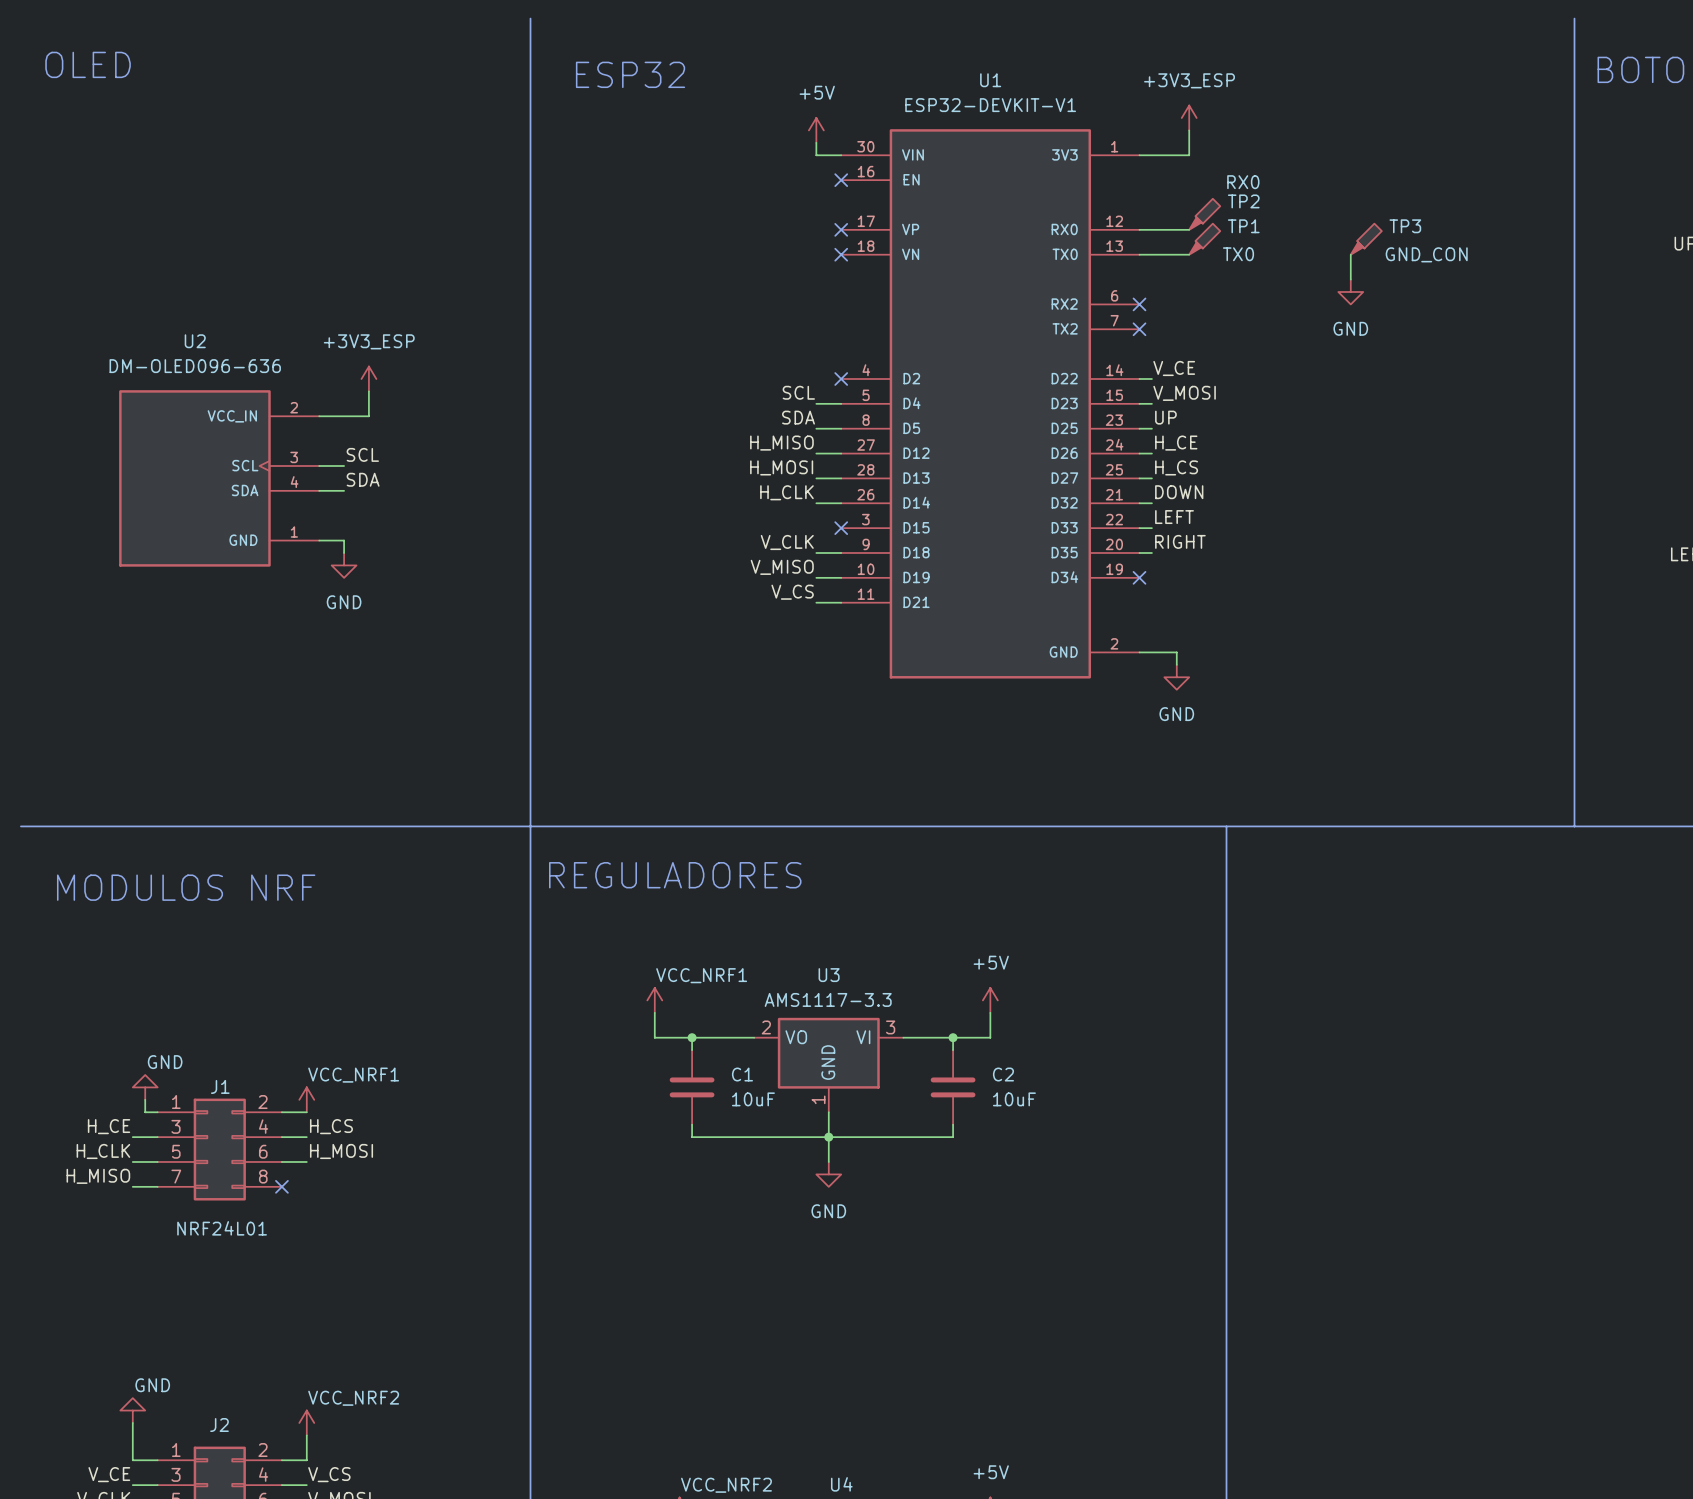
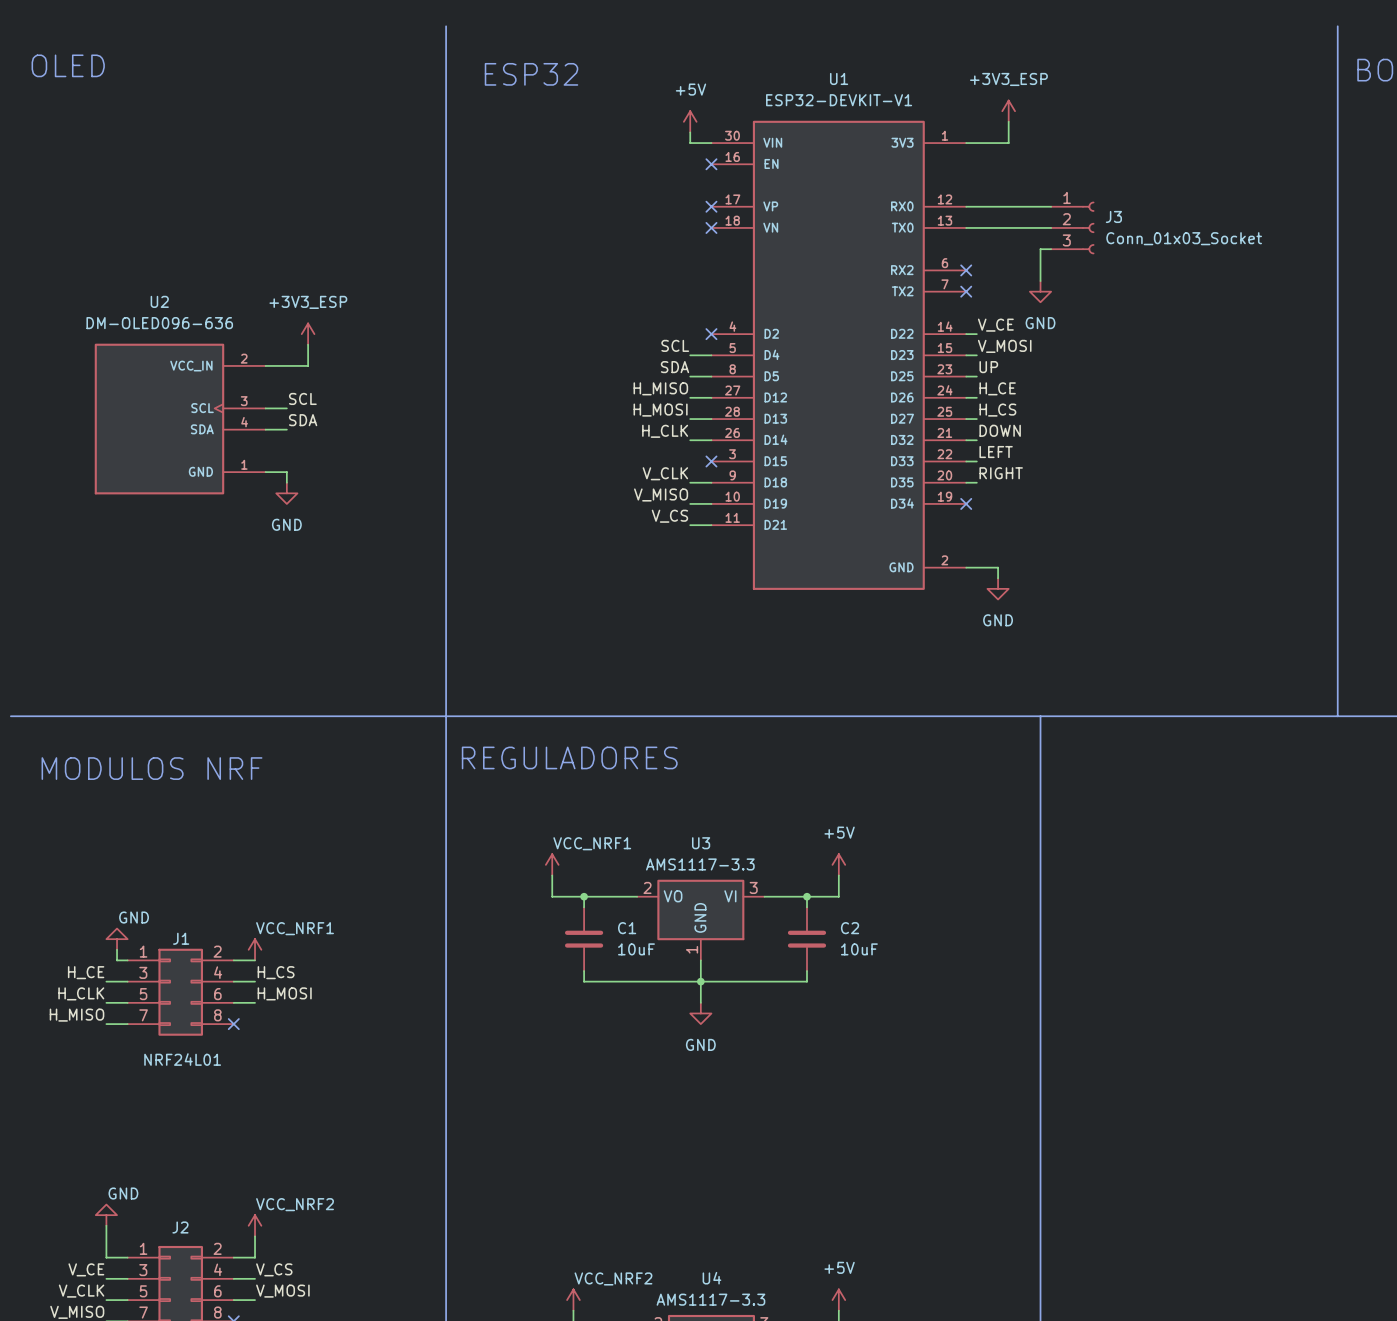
TP2: RX0 (1204, 214) -> none
wire: none -> (1008, 206) (1051, 206)
TP1: TX0 (1204, 239) -> none
TP3: GND_CON (1366, 239) -> none
wire: none -> (1008, 227) (1051, 227)
J3: none -> Conn_01x03_Socket (1072, 227)
wire: (1350, 254) (1350, 279) -> none
wire: none -> (1051, 249) (1040, 249) (1040, 281)
power symbol position: GND (1350, 291) -> GND (1040, 291)

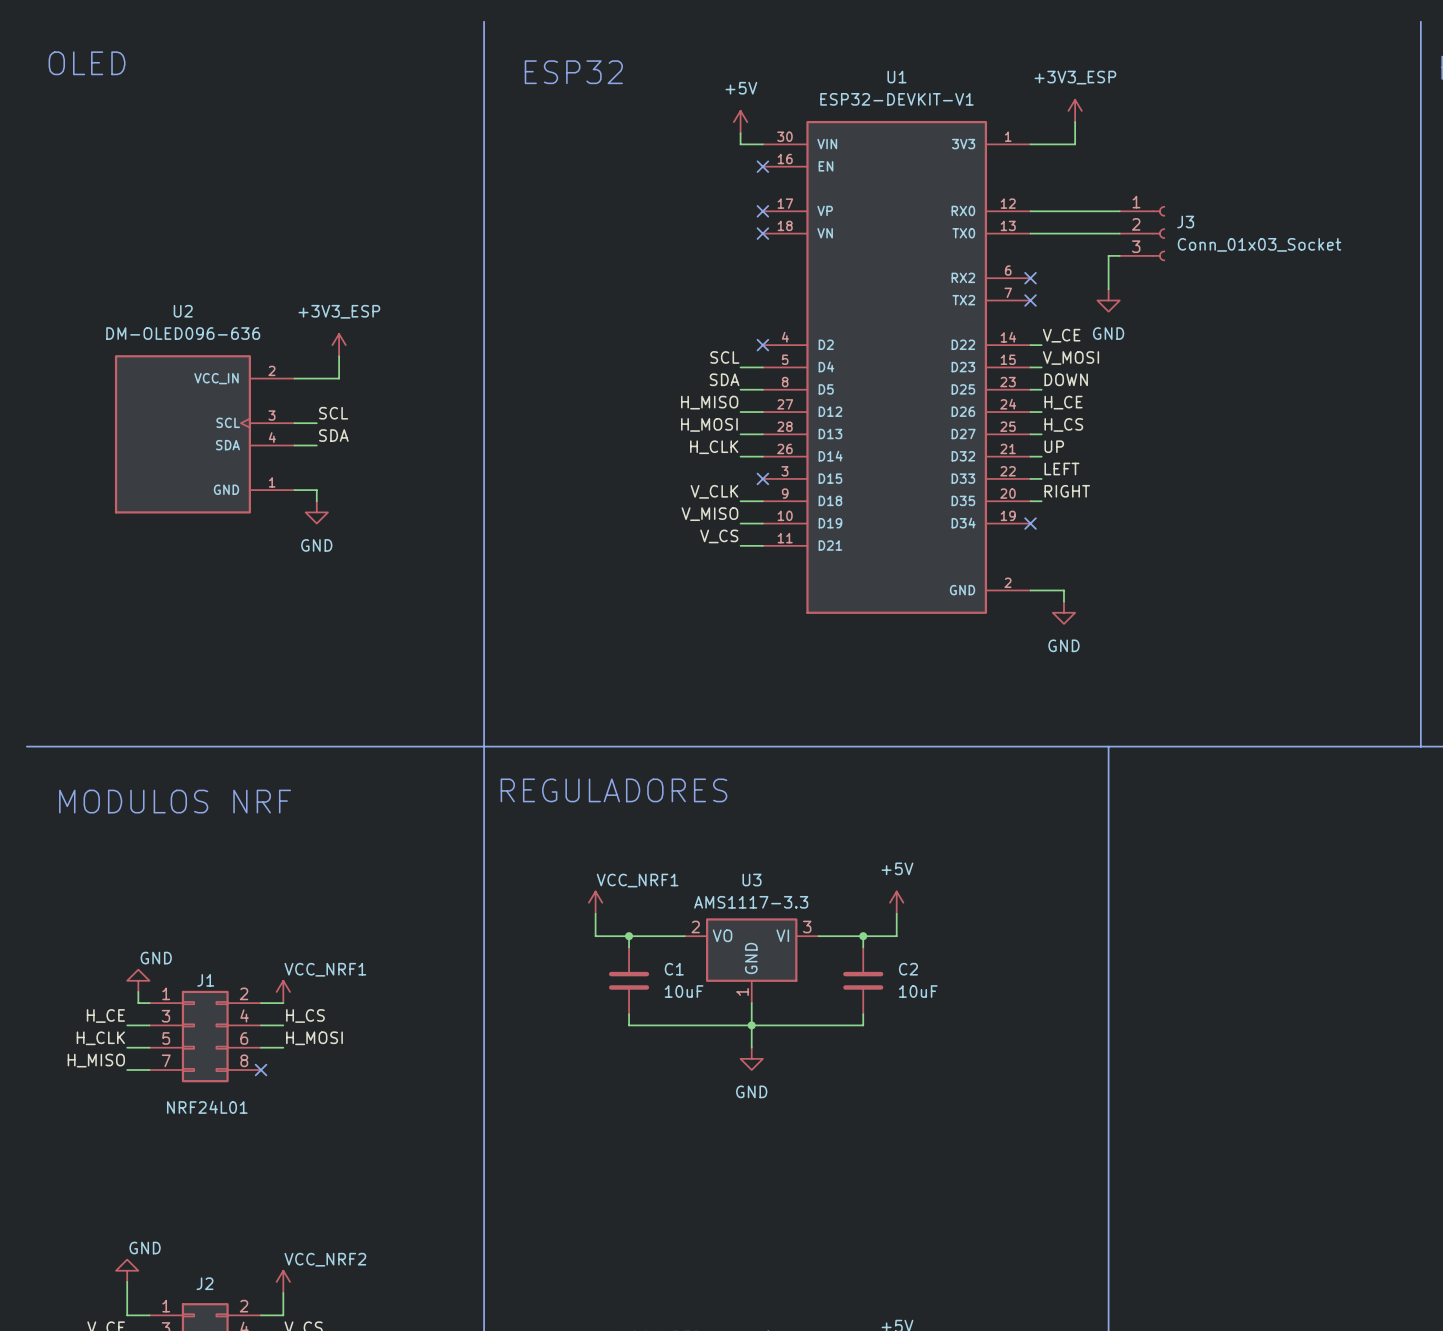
label: UP (988, 367) -> DOWN (1066, 379)
label: DOWN (1000, 430) -> UP (1054, 446)

